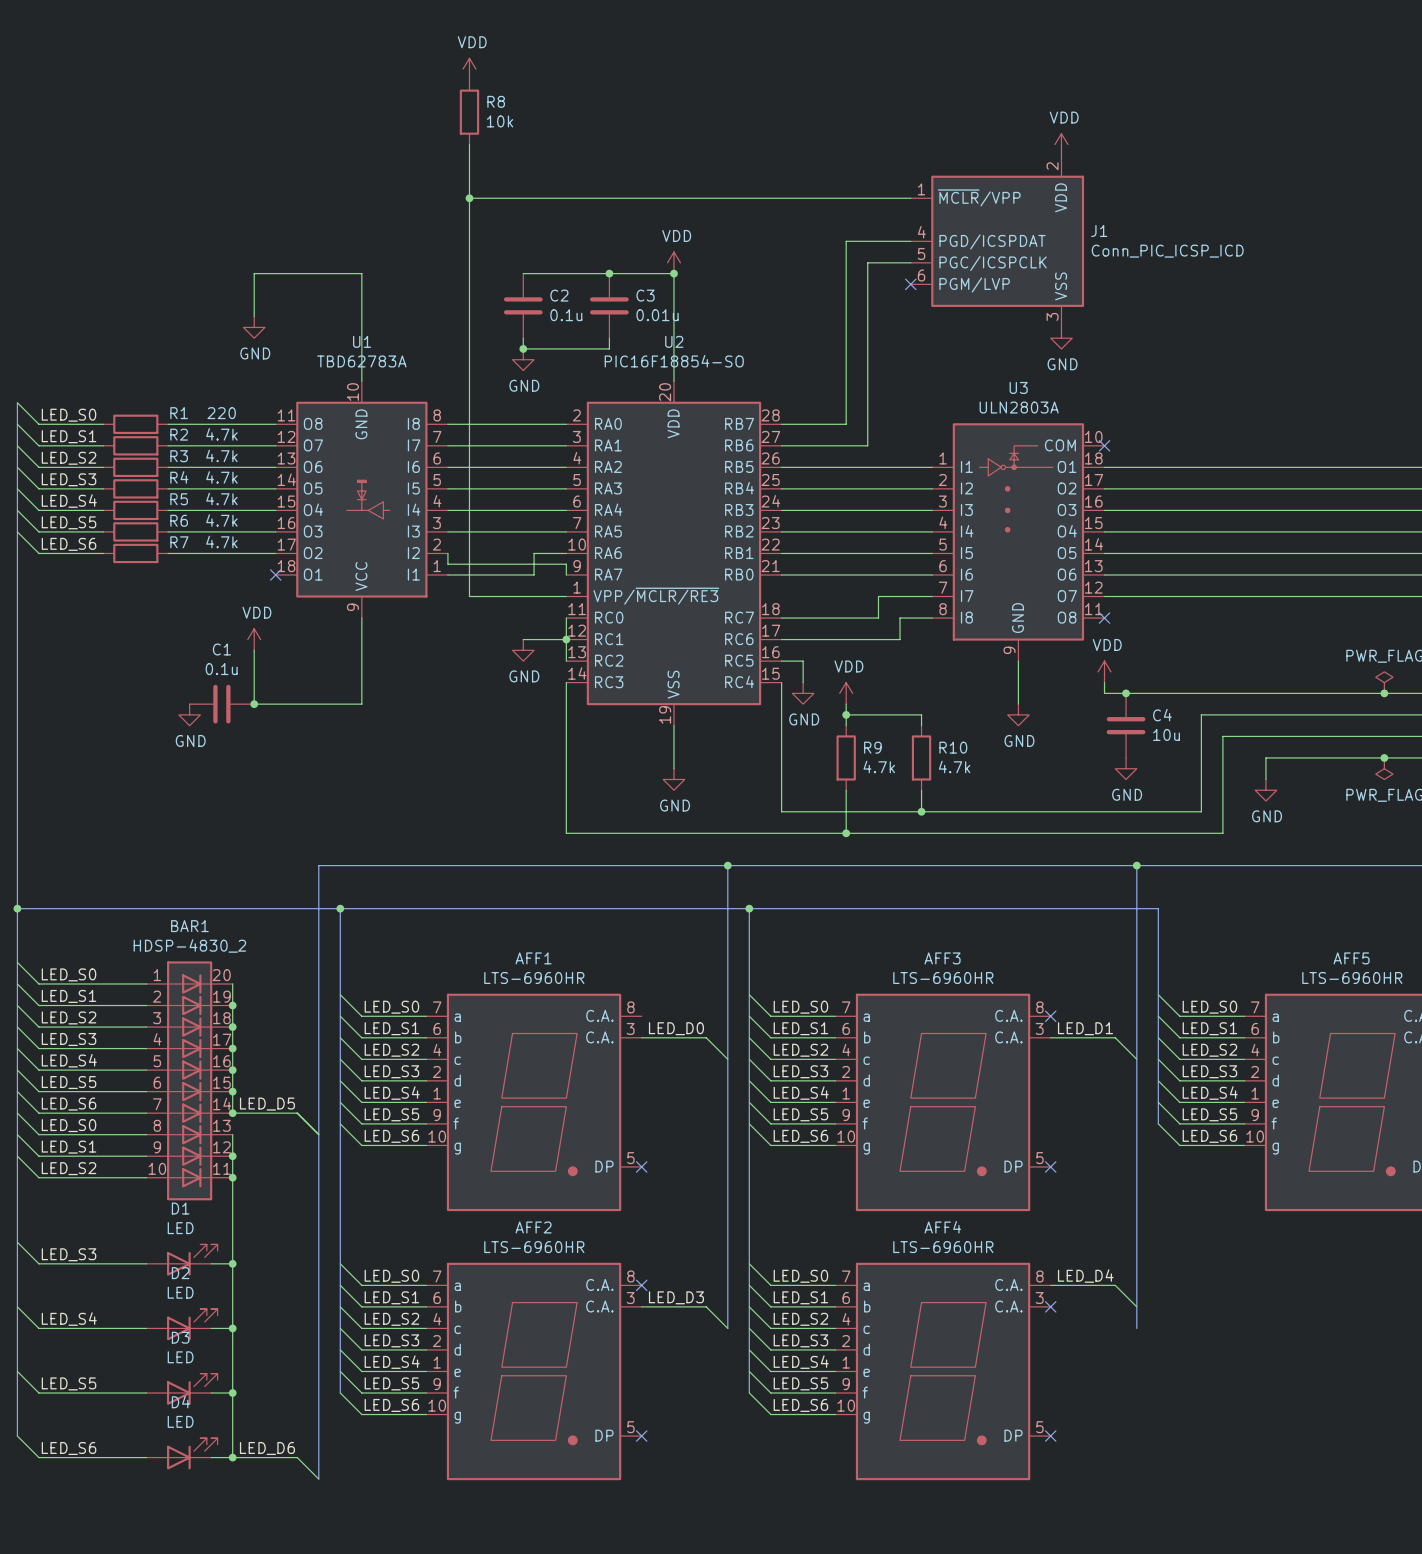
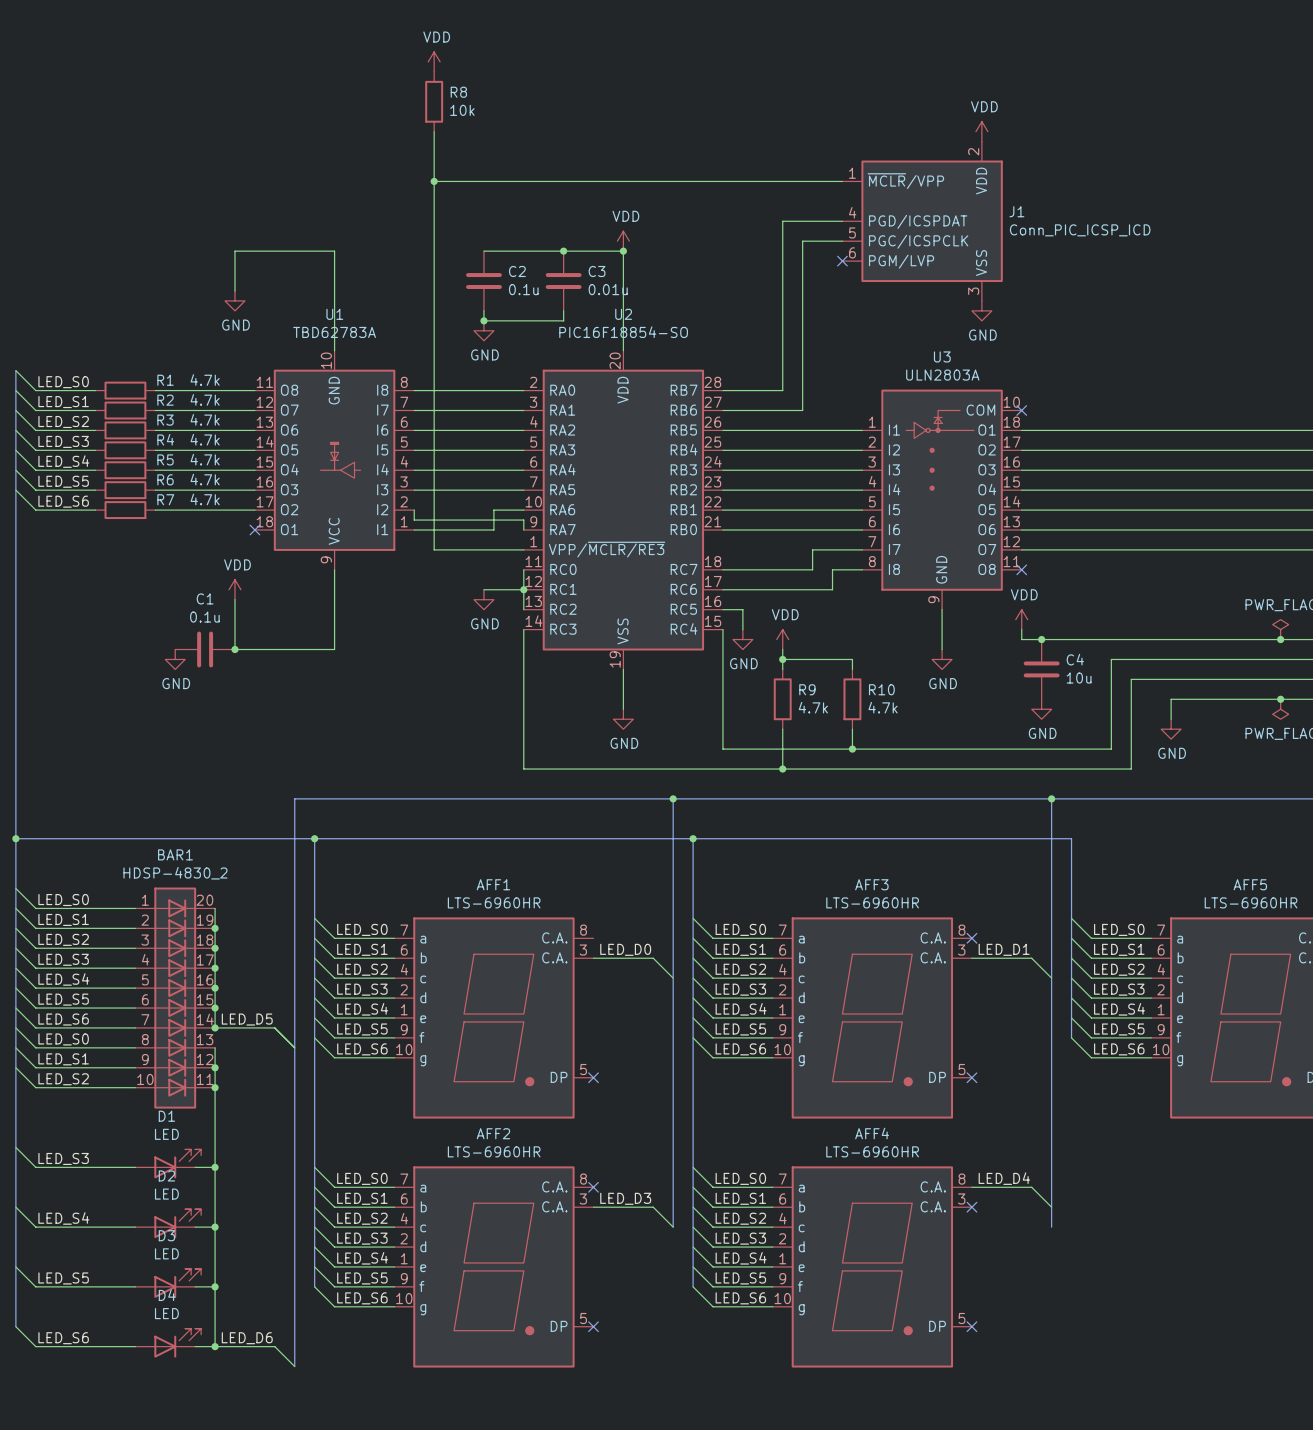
R1 value: 220 (221, 413) -> 4.7k (205, 380)

